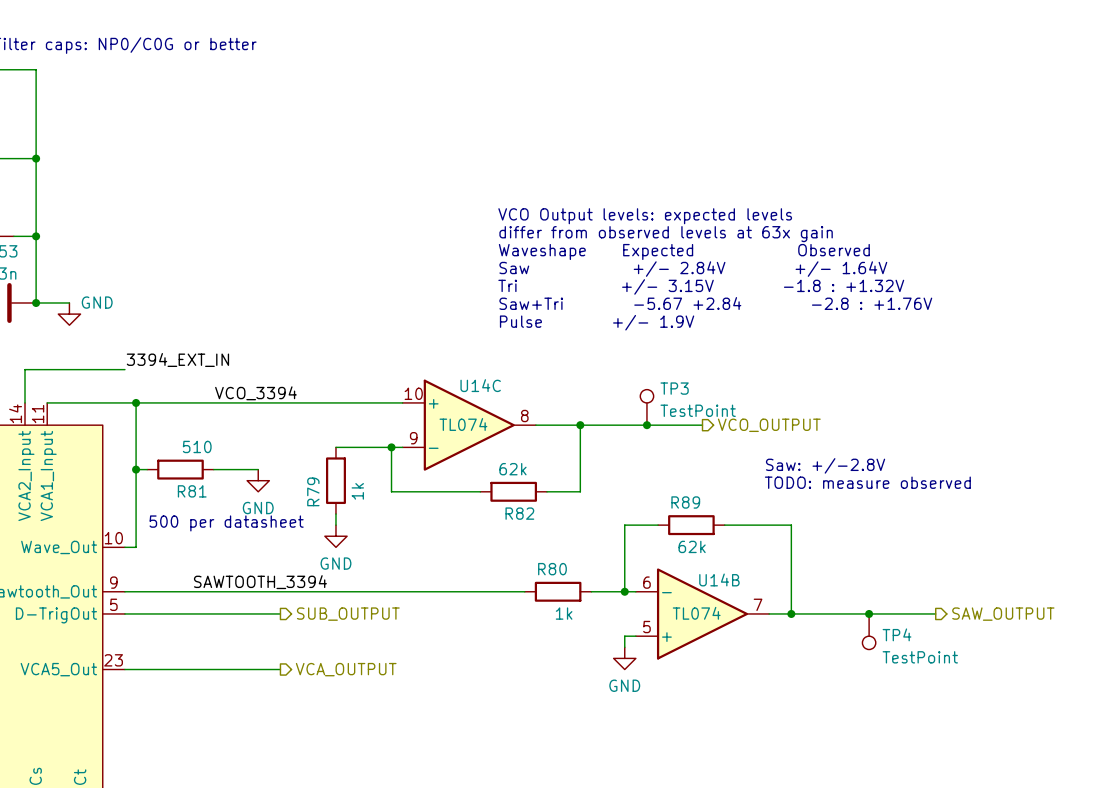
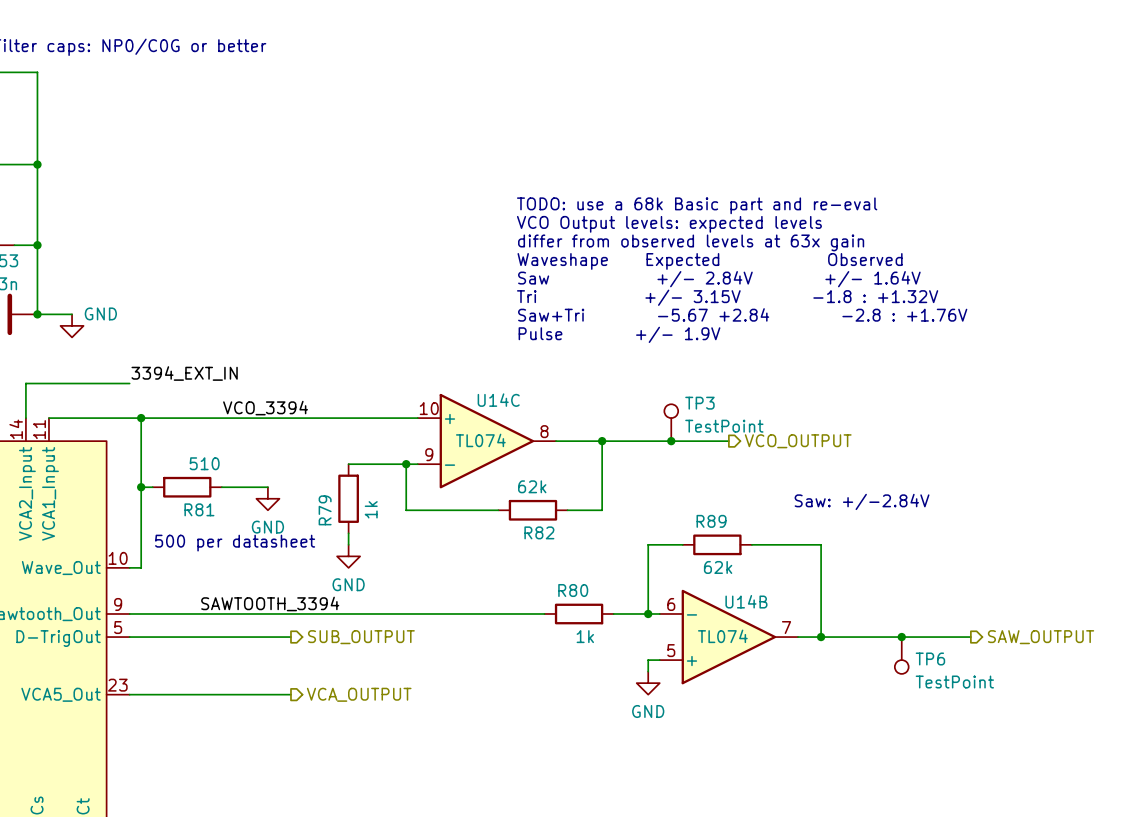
text: none -> TODO: use a 68k Basic part and re-eval (697, 205)
text: Saw: +/-2.8V (825, 465) -> none
text: TODO: measure observed (867, 482) -> Saw: +/-2.84V (862, 501)
TP4 name: TP4 (897, 634) -> TP6 (930, 658)

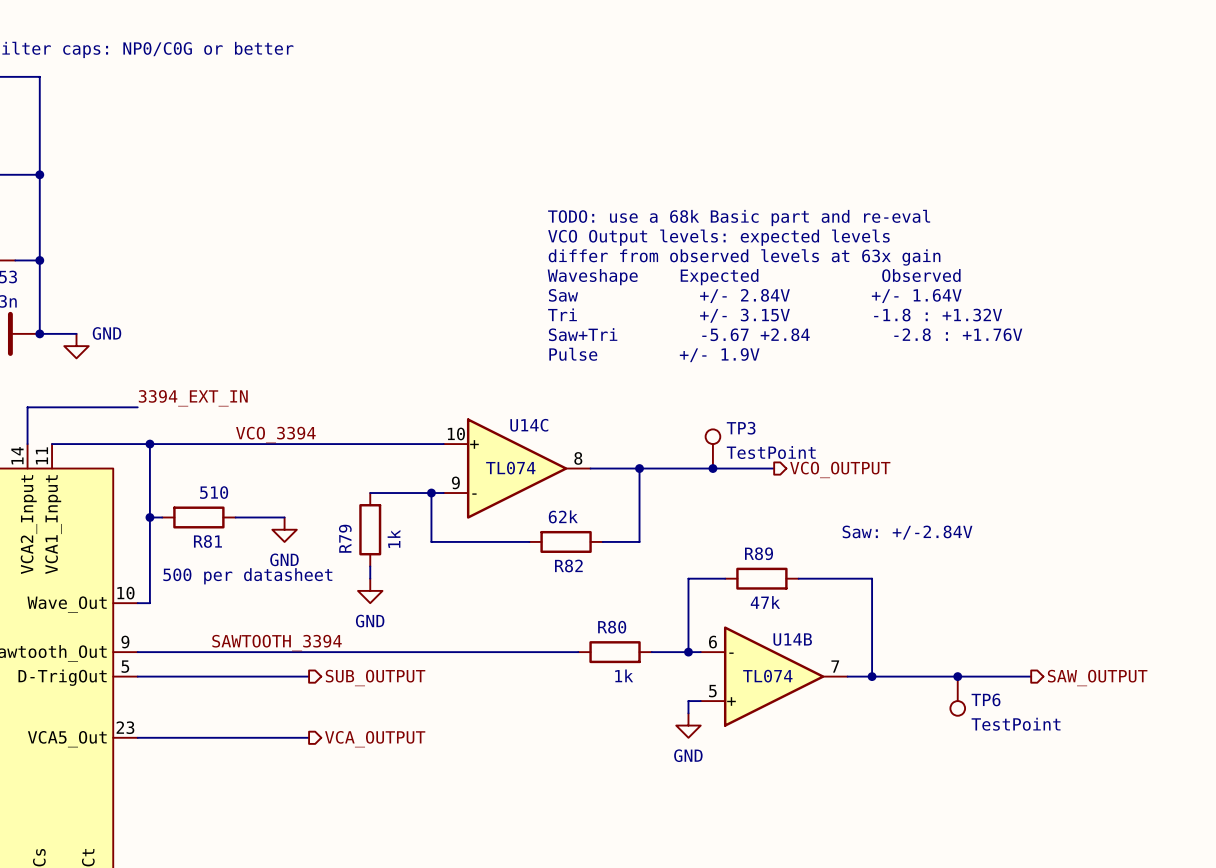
R89 value: 62k (718, 567) -> 47k (765, 602)

